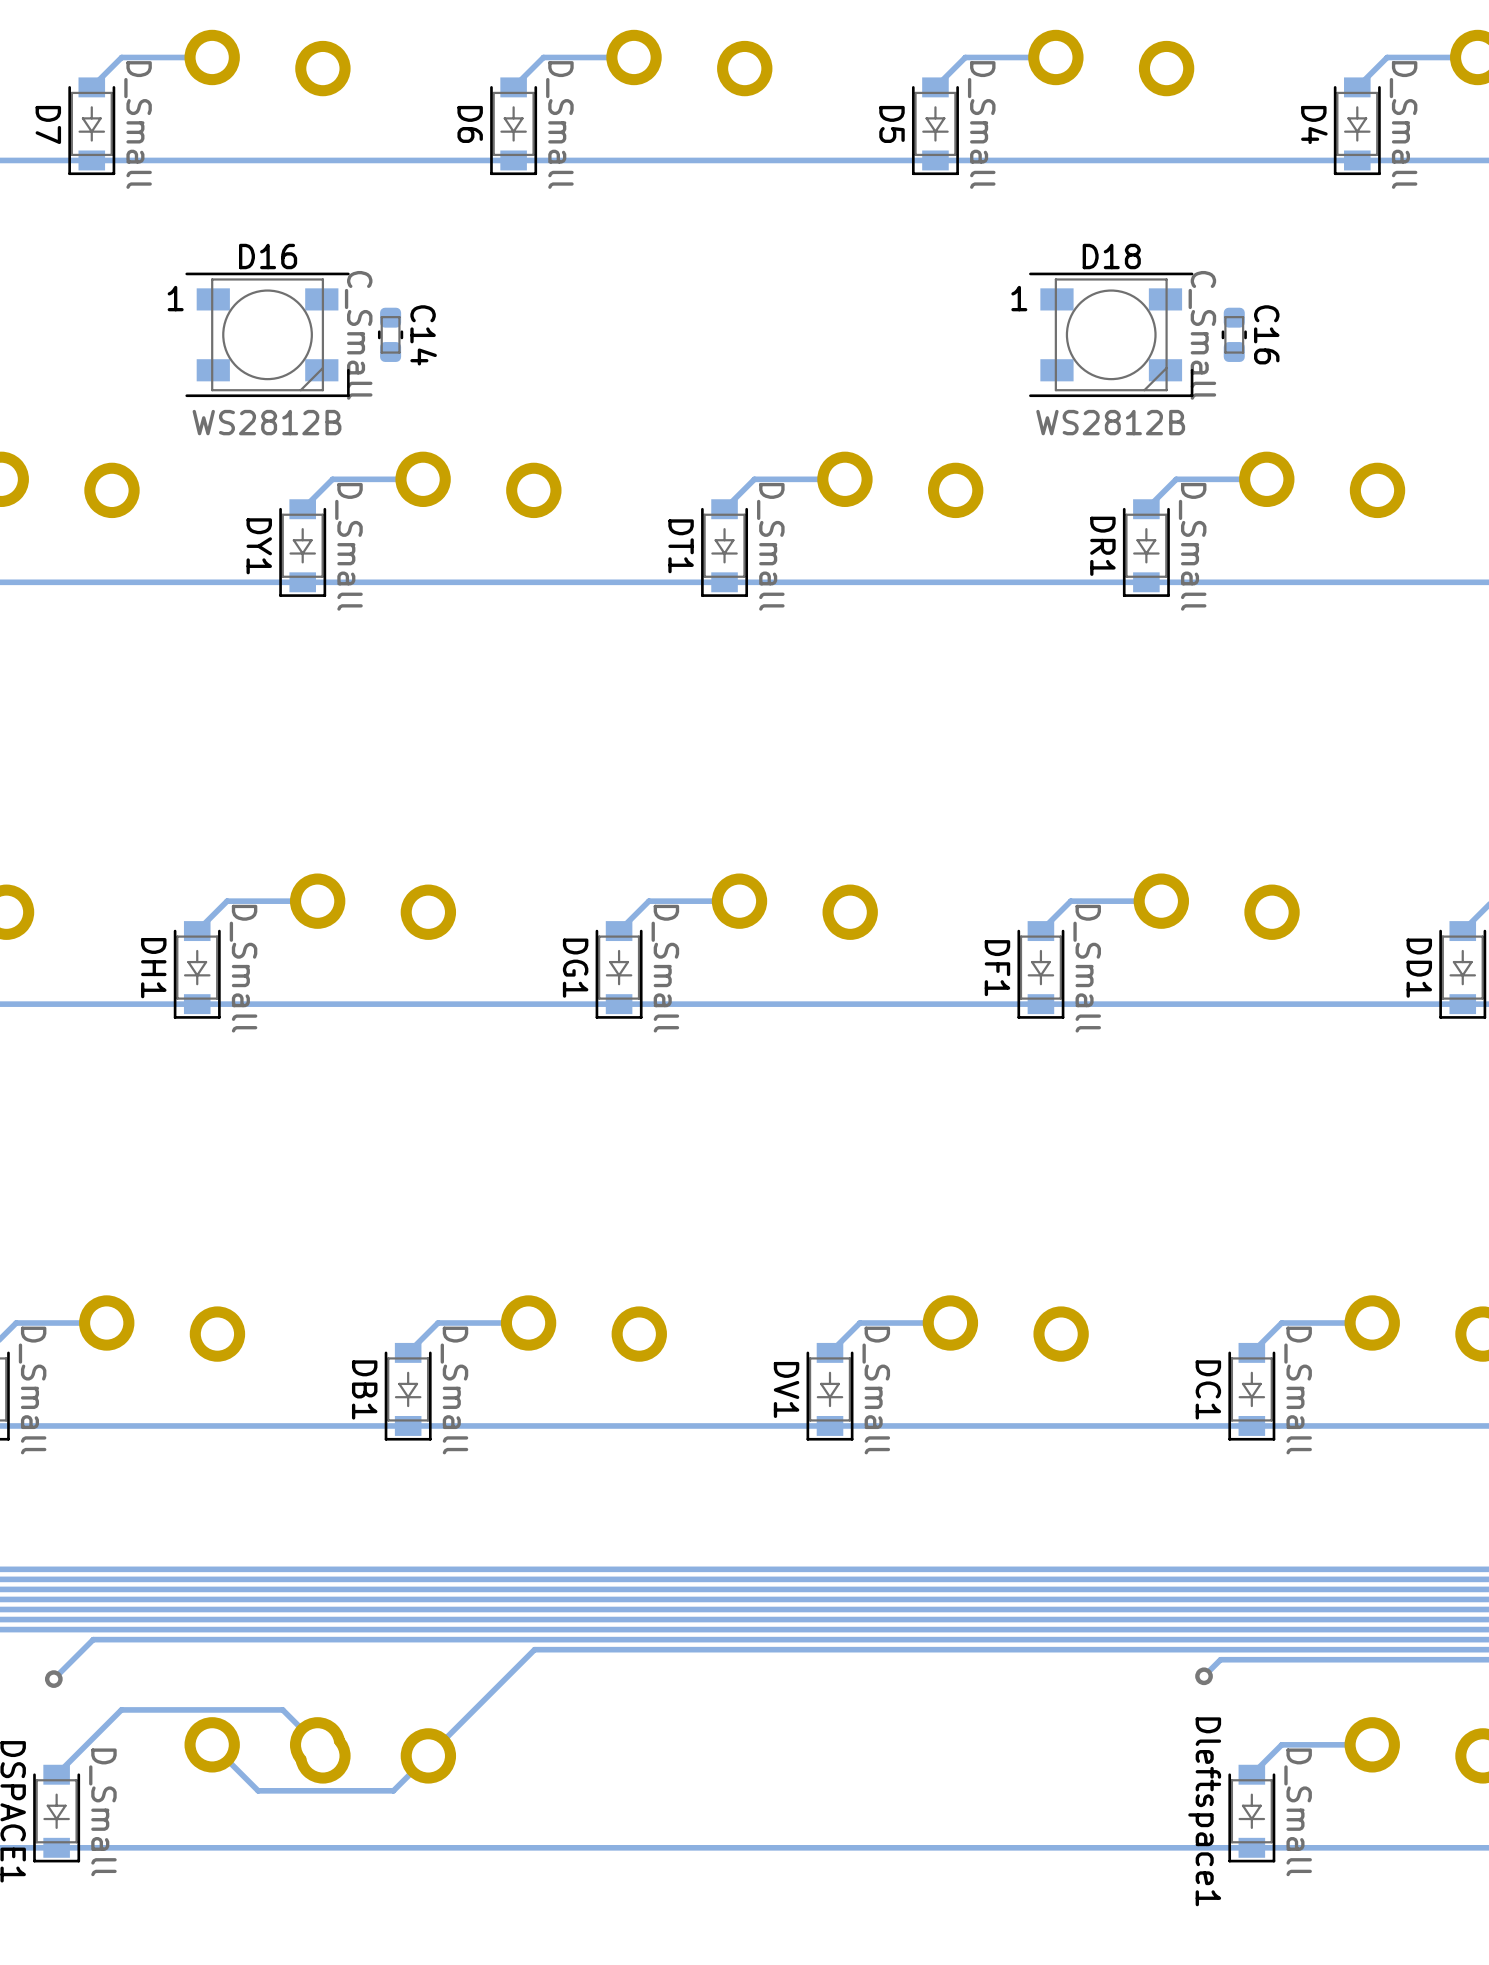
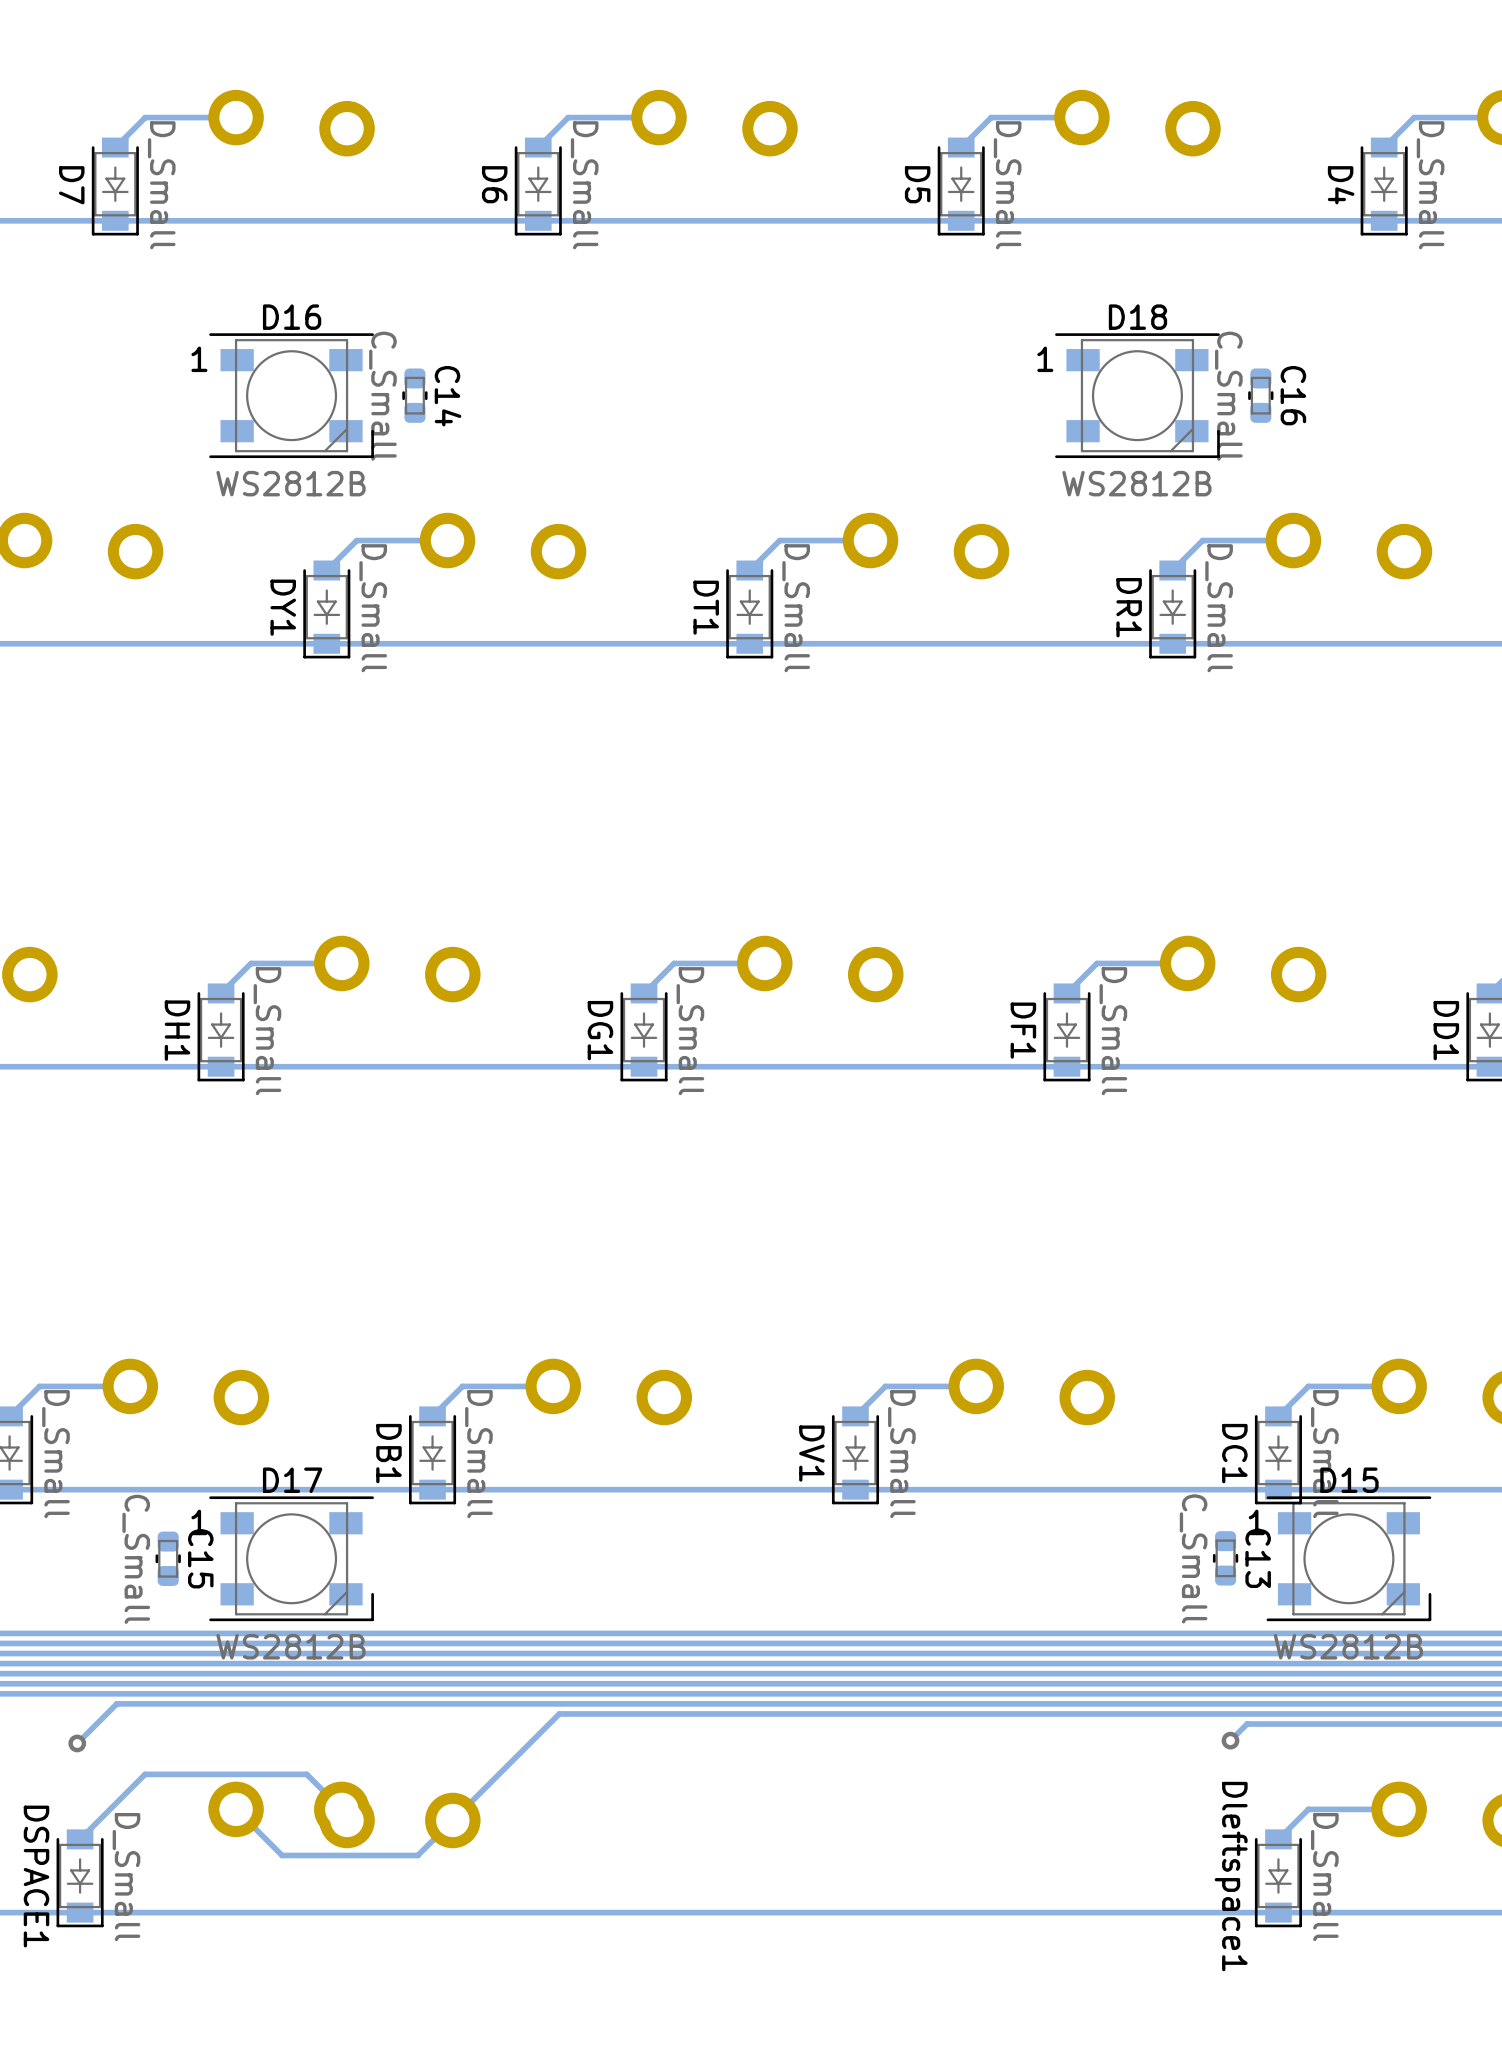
C15: none -> C_Small (168, 1558)
D17: none -> WS2812B (291, 1558)
C13: none -> C_Small (1225, 1558)
D15: none -> WS2812B (1348, 1558)

